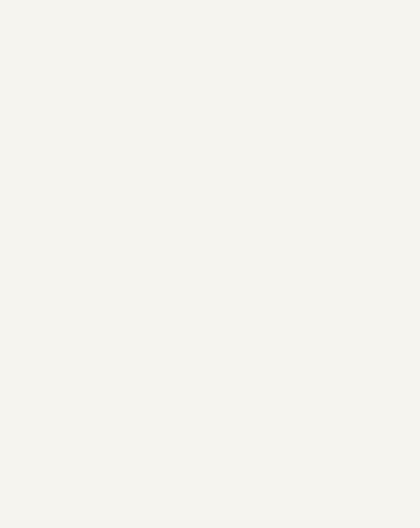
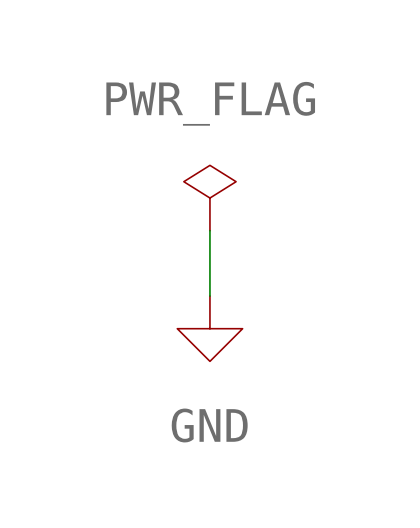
power symbol: none -> PWR_FLAG (209, 198)
wire: none -> (209, 230) (209, 296)
power symbol: none -> GND (209, 328)

